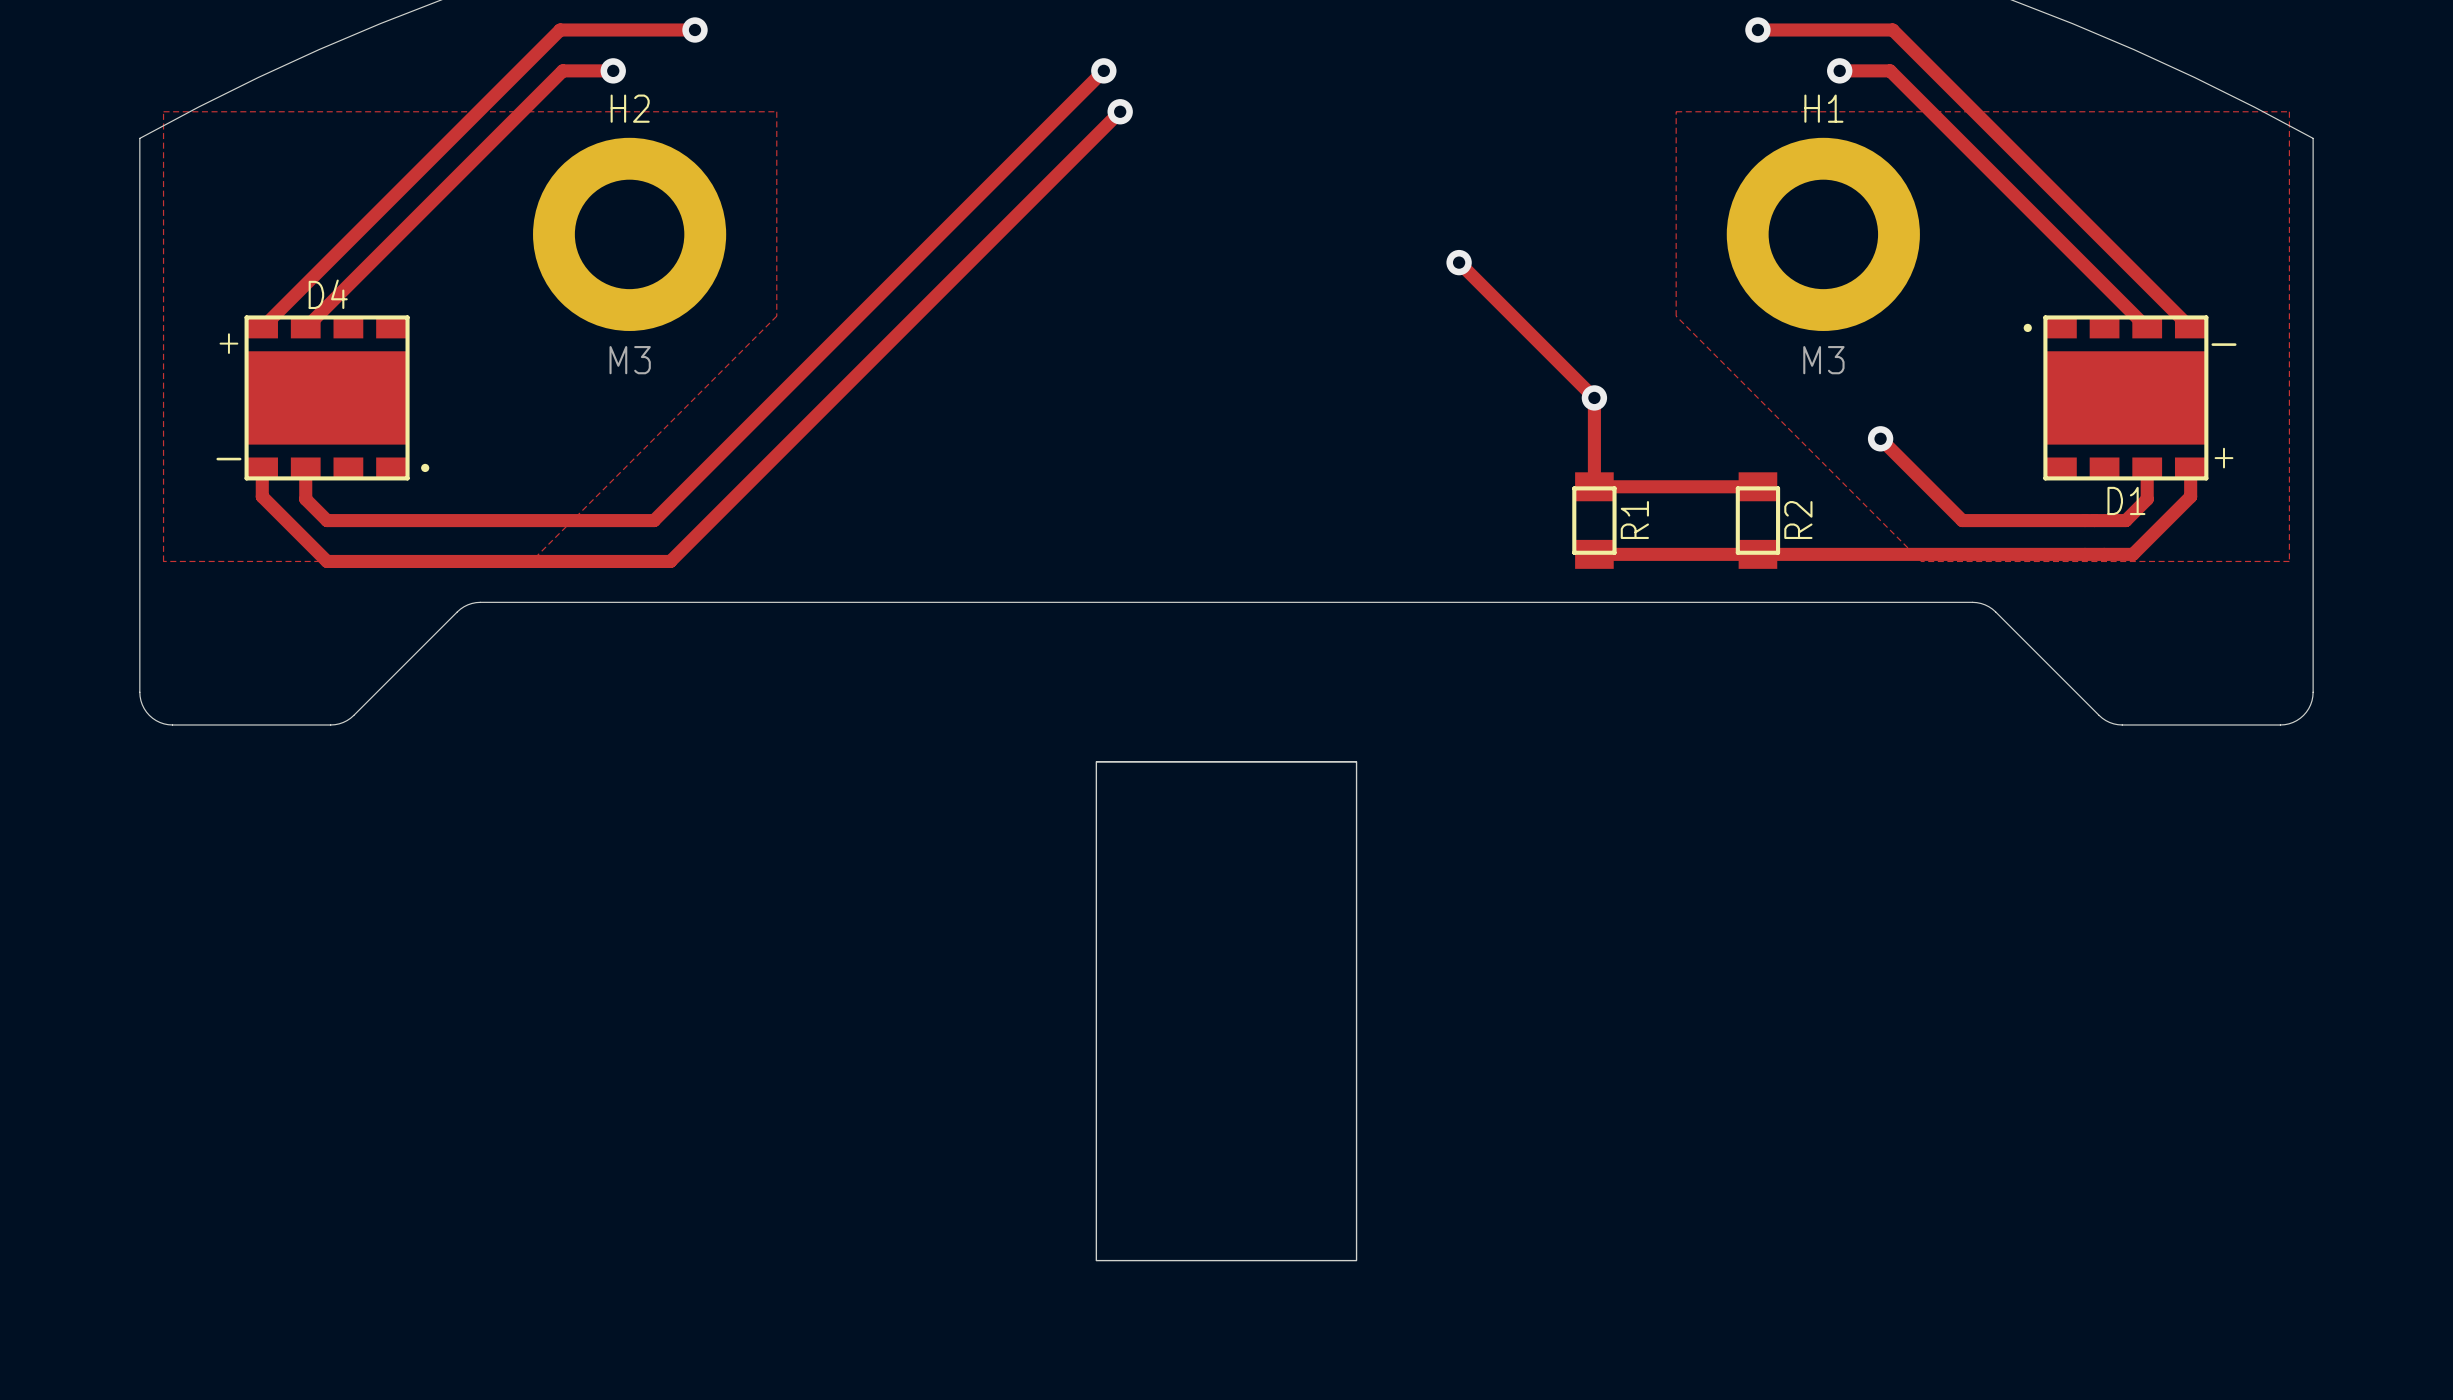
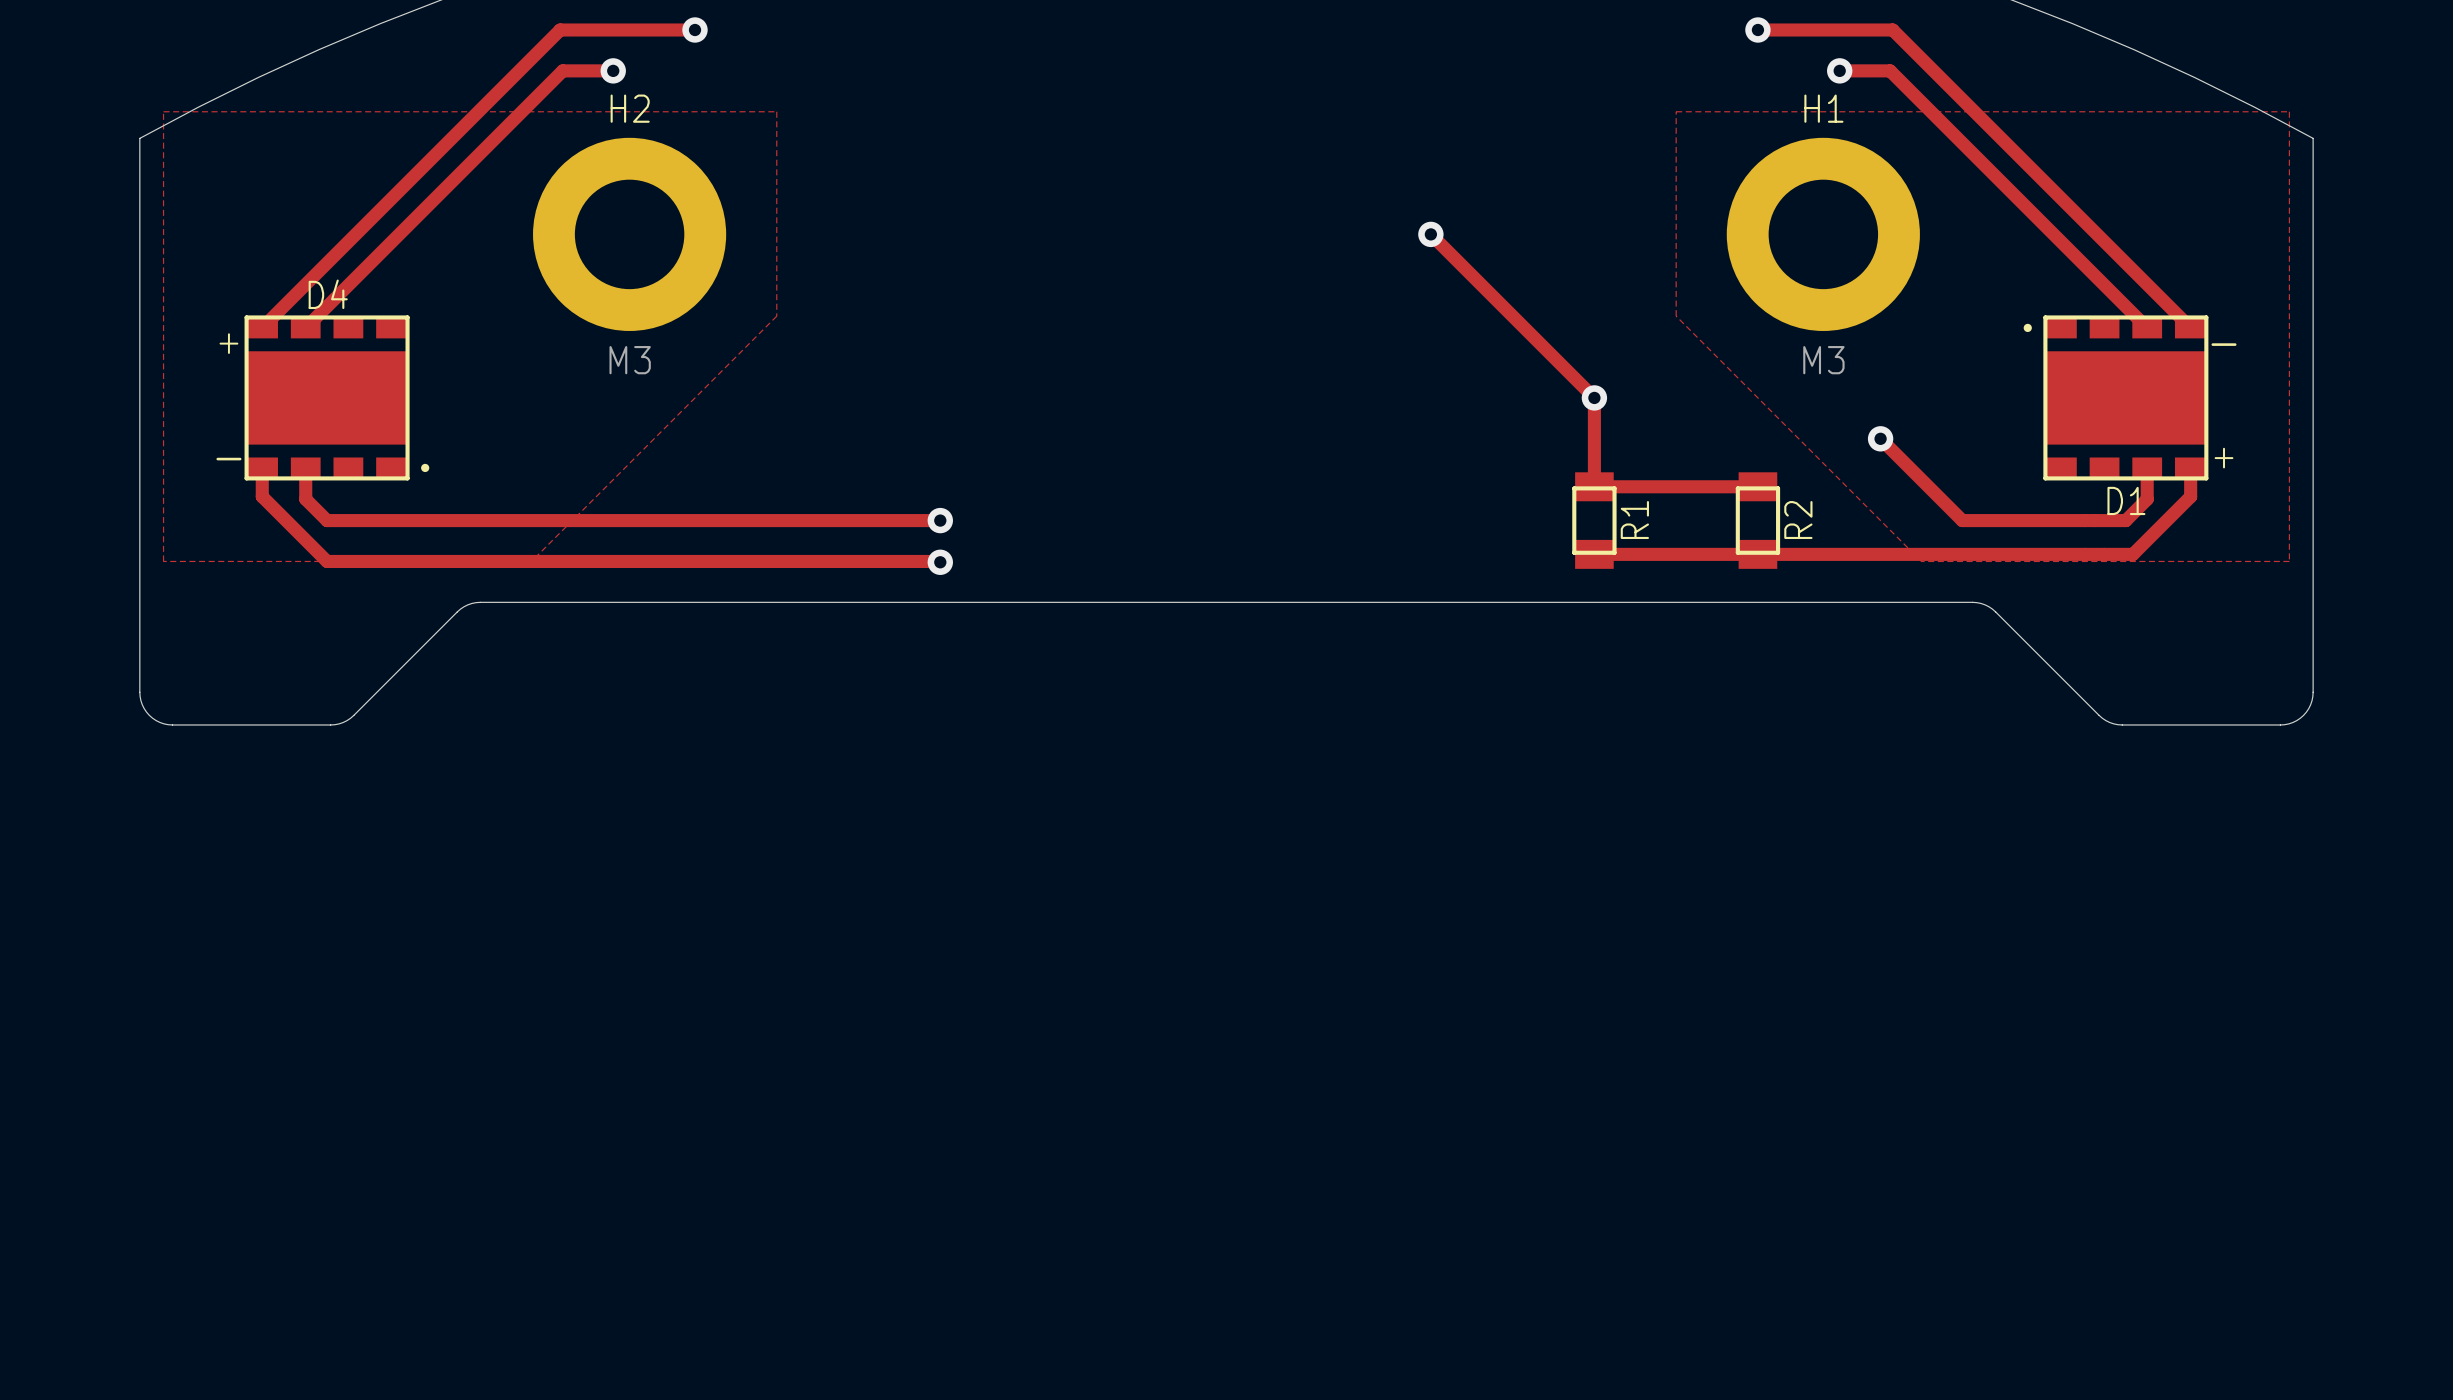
track: (1103, 70) (654, 520) -> (940, 520) (654, 520)
via: (1103, 70) -> none
track: (1120, 111) (670, 561) -> (940, 562) (670, 561)
via: (1120, 111) -> none
track: none -> (1430, 234) (1459, 262)
via position: (1459, 262) -> (1430, 234)
via: none -> (940, 520)
via: none -> (940, 562)
part: (1226, 1011) -> none

